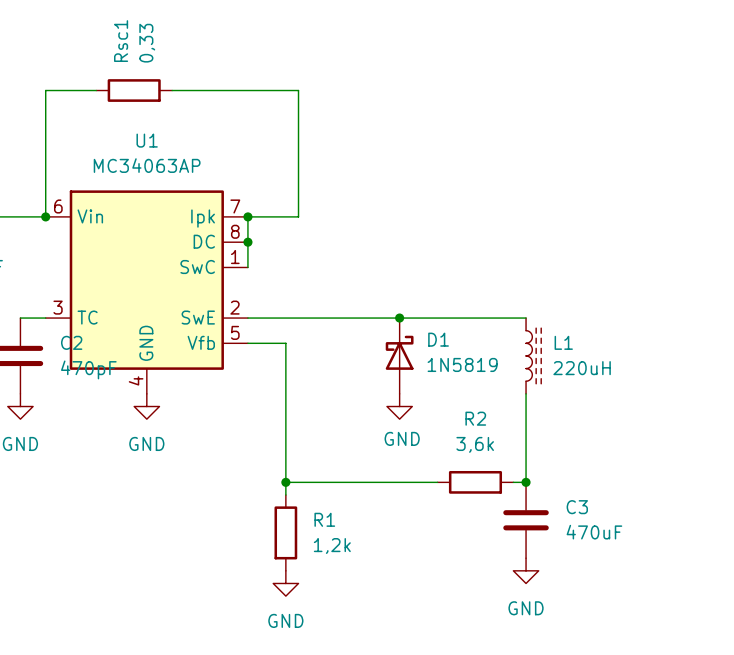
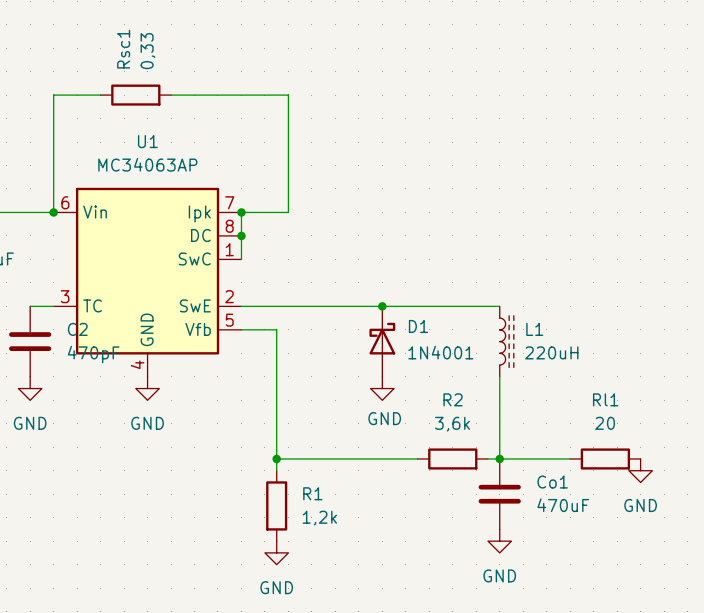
D1 value: 1N5819 (462, 364) -> 1N4001 (440, 352)
wire: none -> (499, 458) (570, 458)
Rl1: none -> 20 (605, 458)
power symbol: none -> GND (640, 470)
C3 name: C3 (577, 507) -> Co1 (552, 482)

